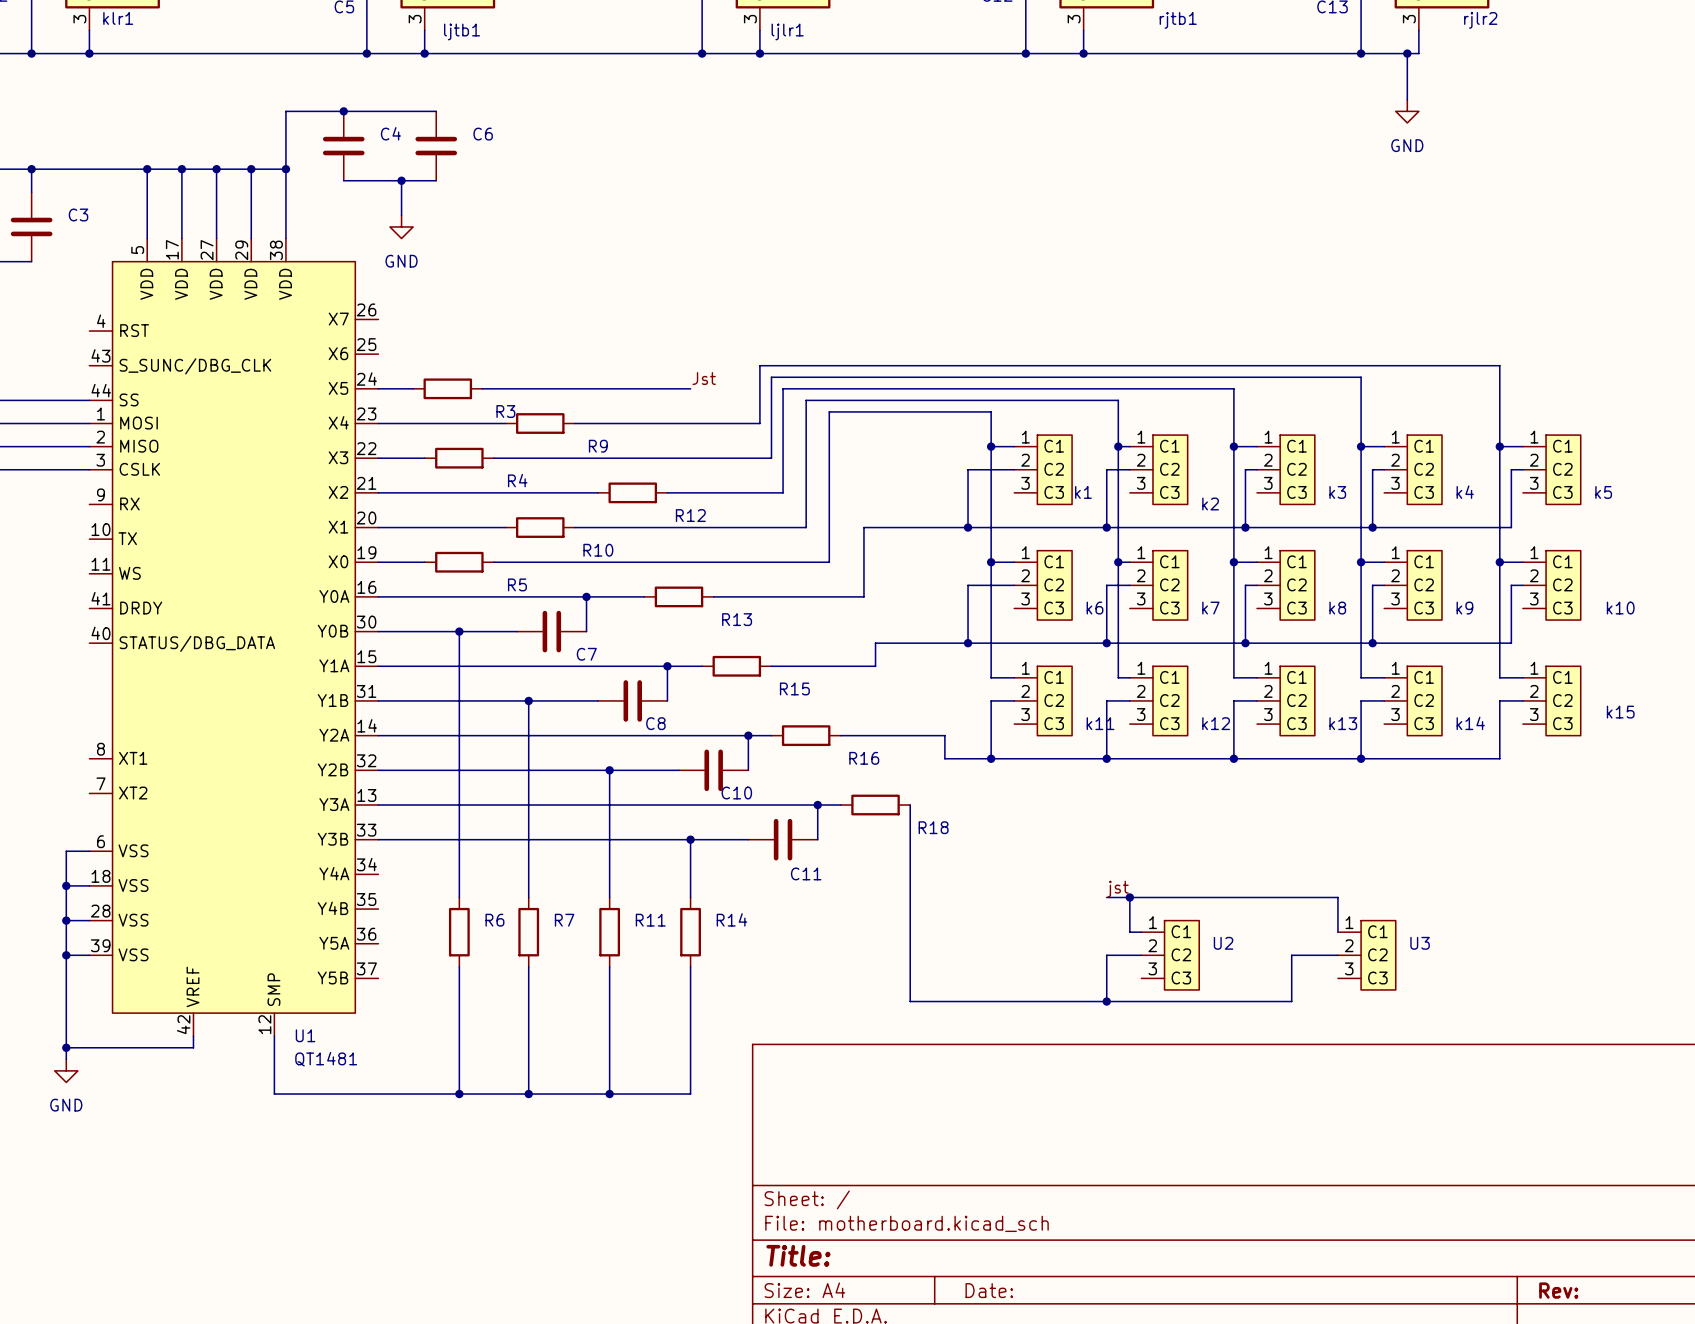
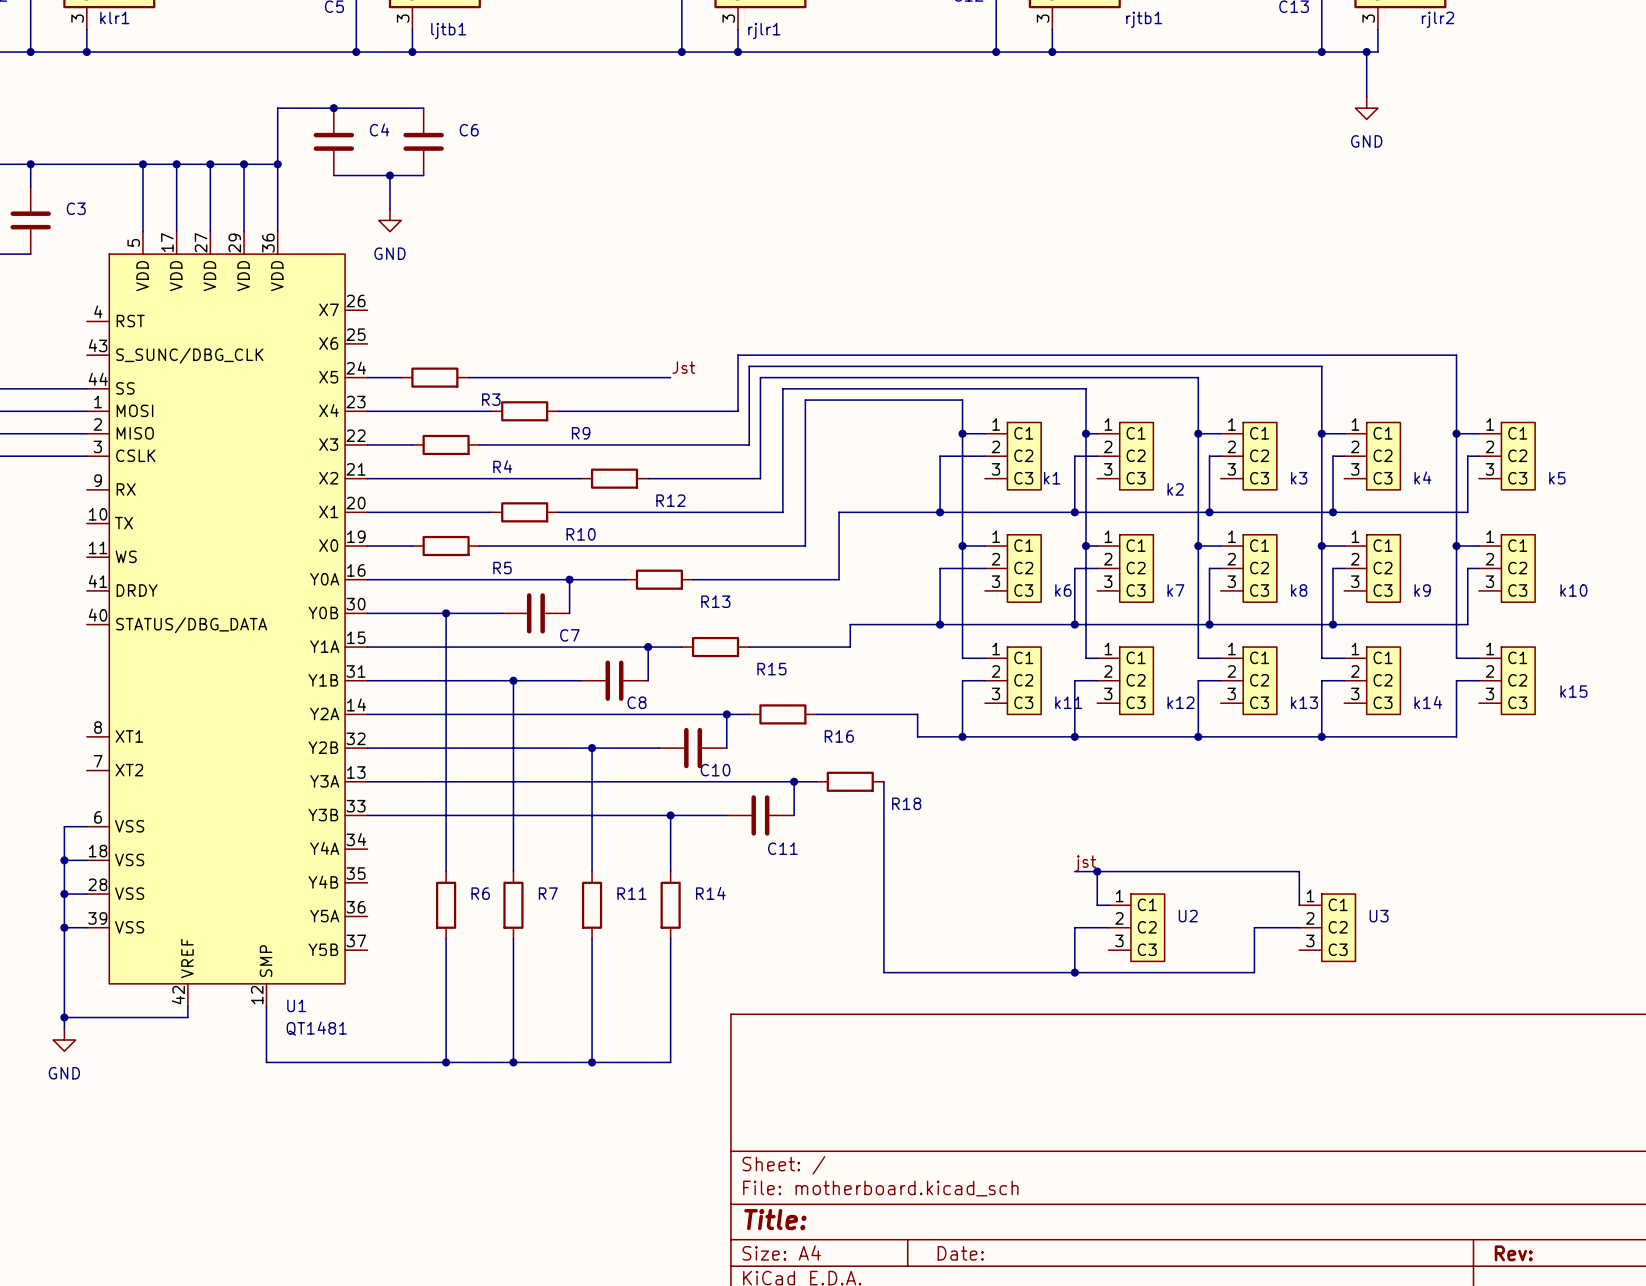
ljlr1 name: ljlr1 (787, 31) -> rjlr1 (764, 31)
U1 pin number: 38 (276, 250) -> 36 (268, 243)

